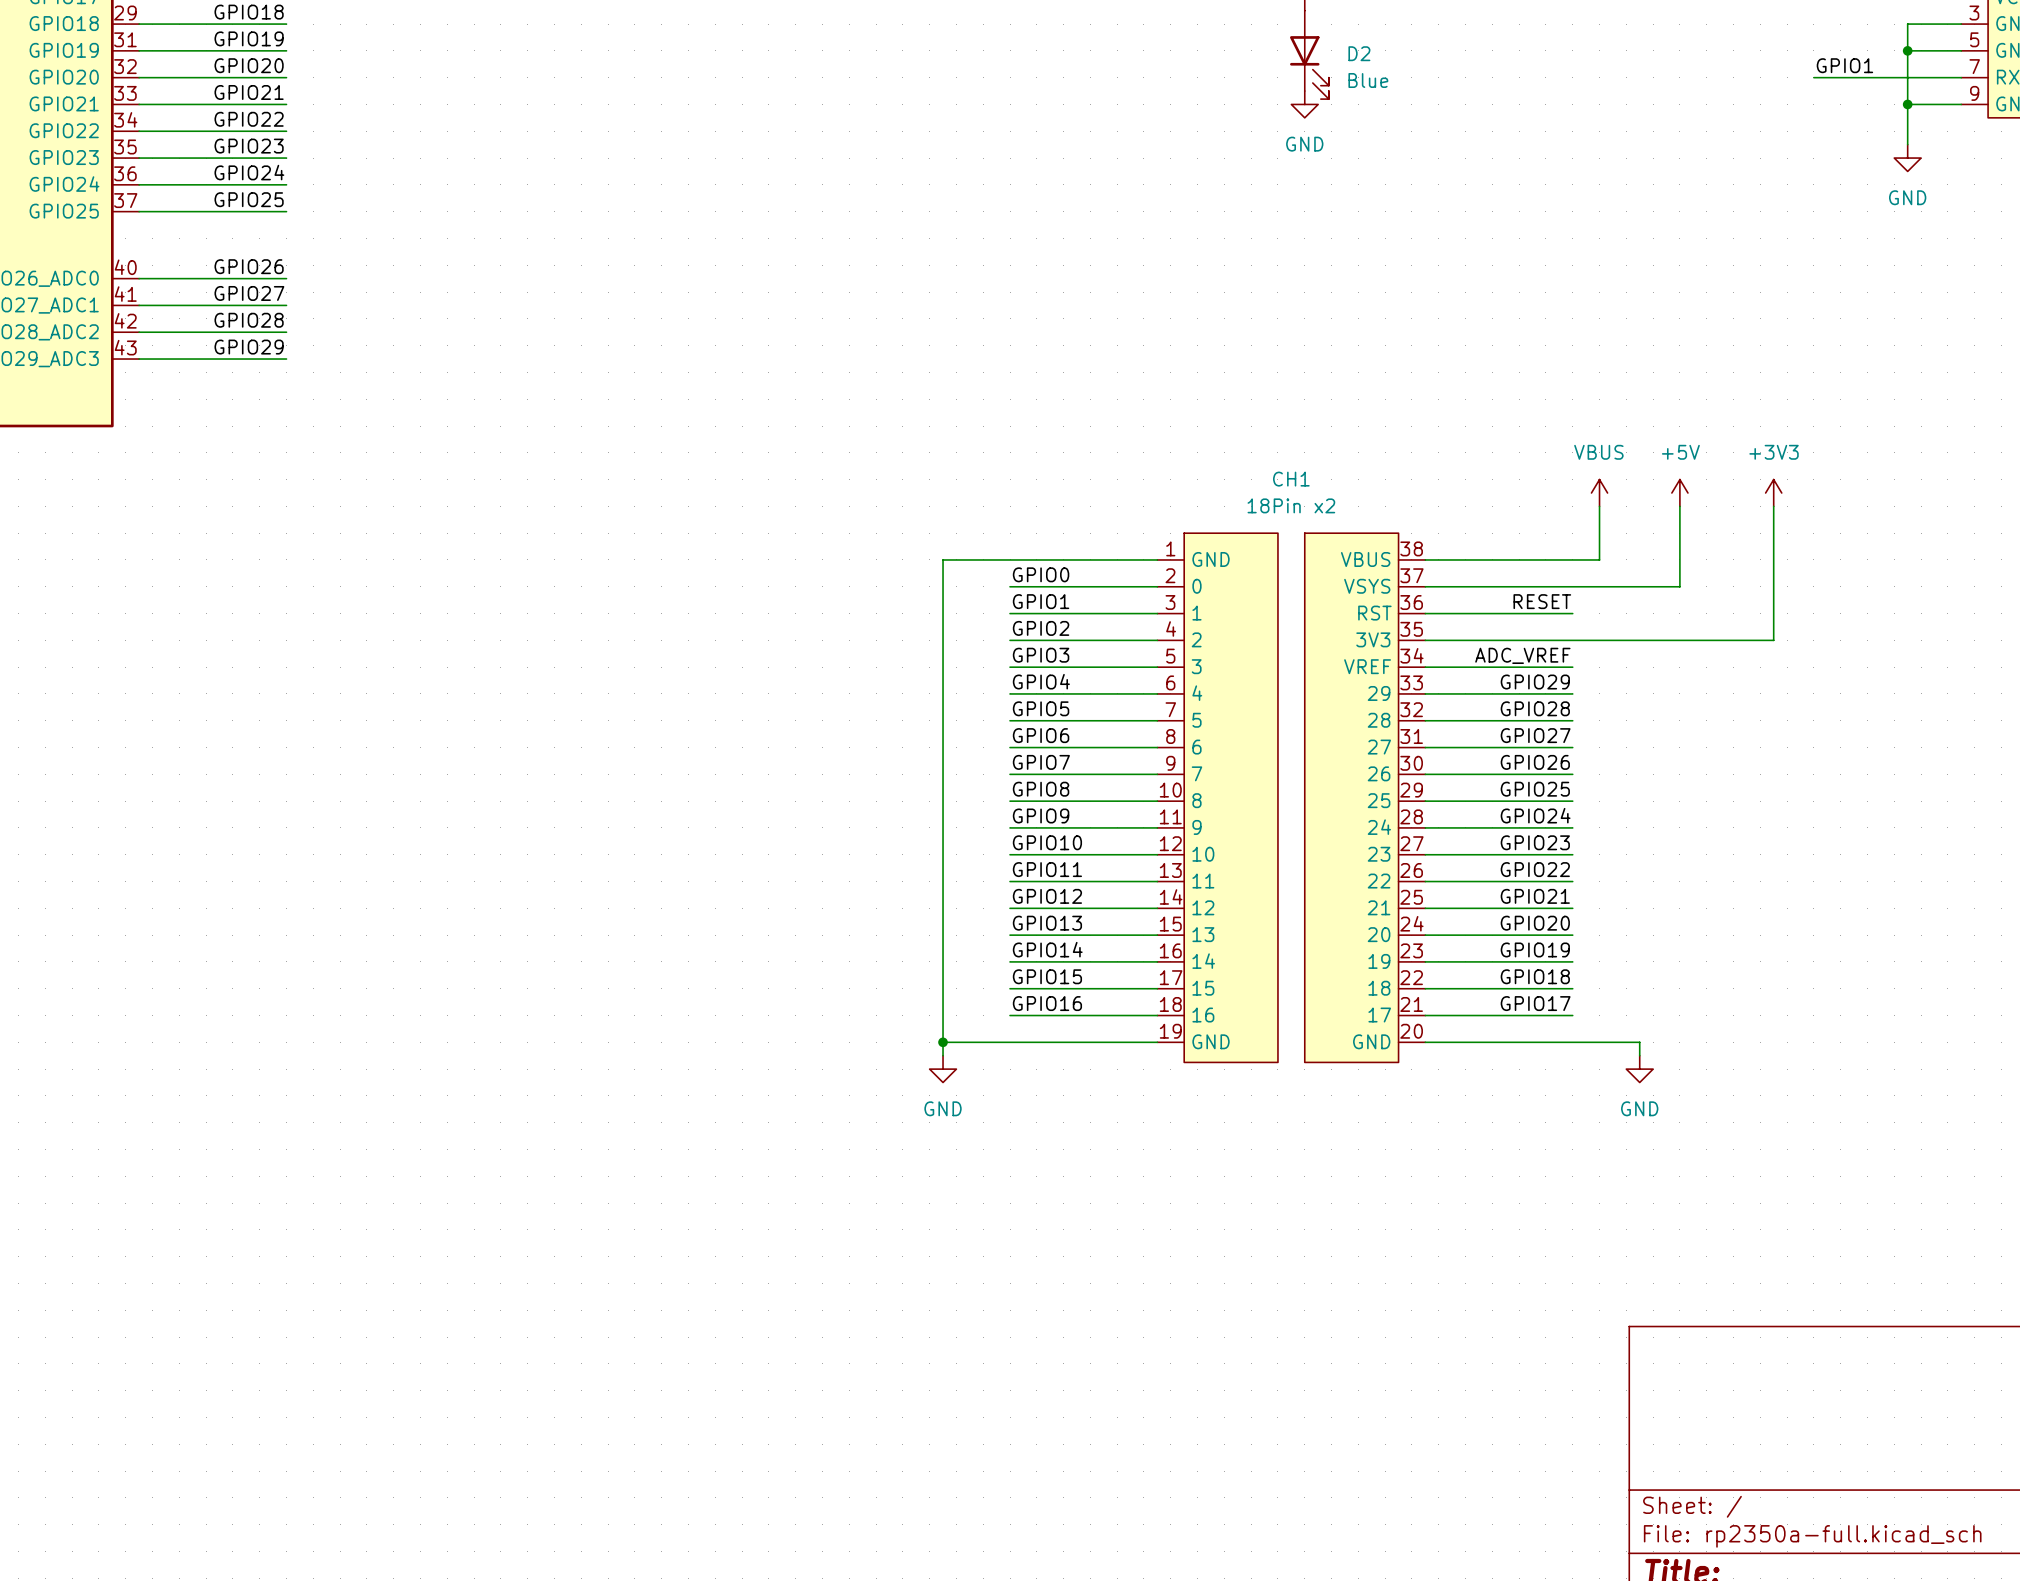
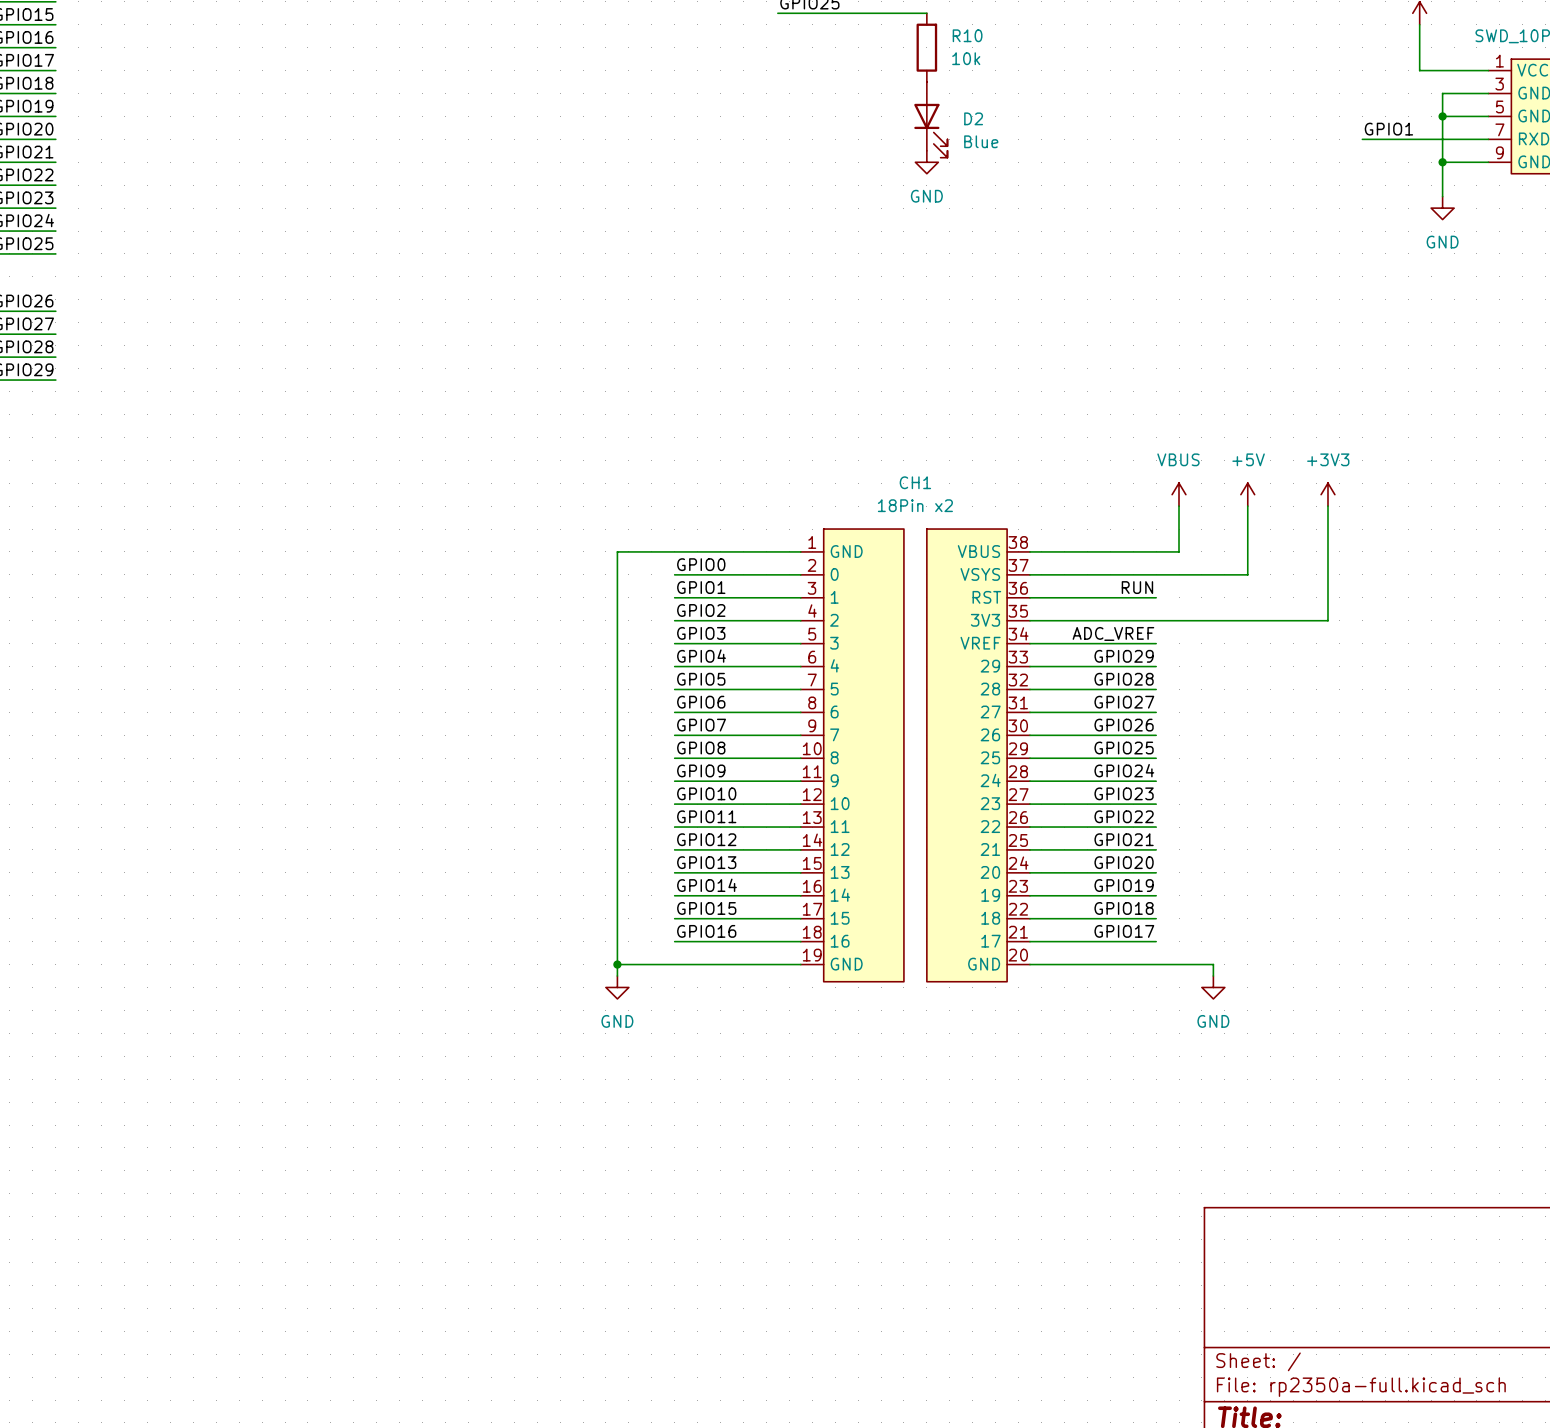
label: RESET (1542, 601) -> RUN (1137, 587)

